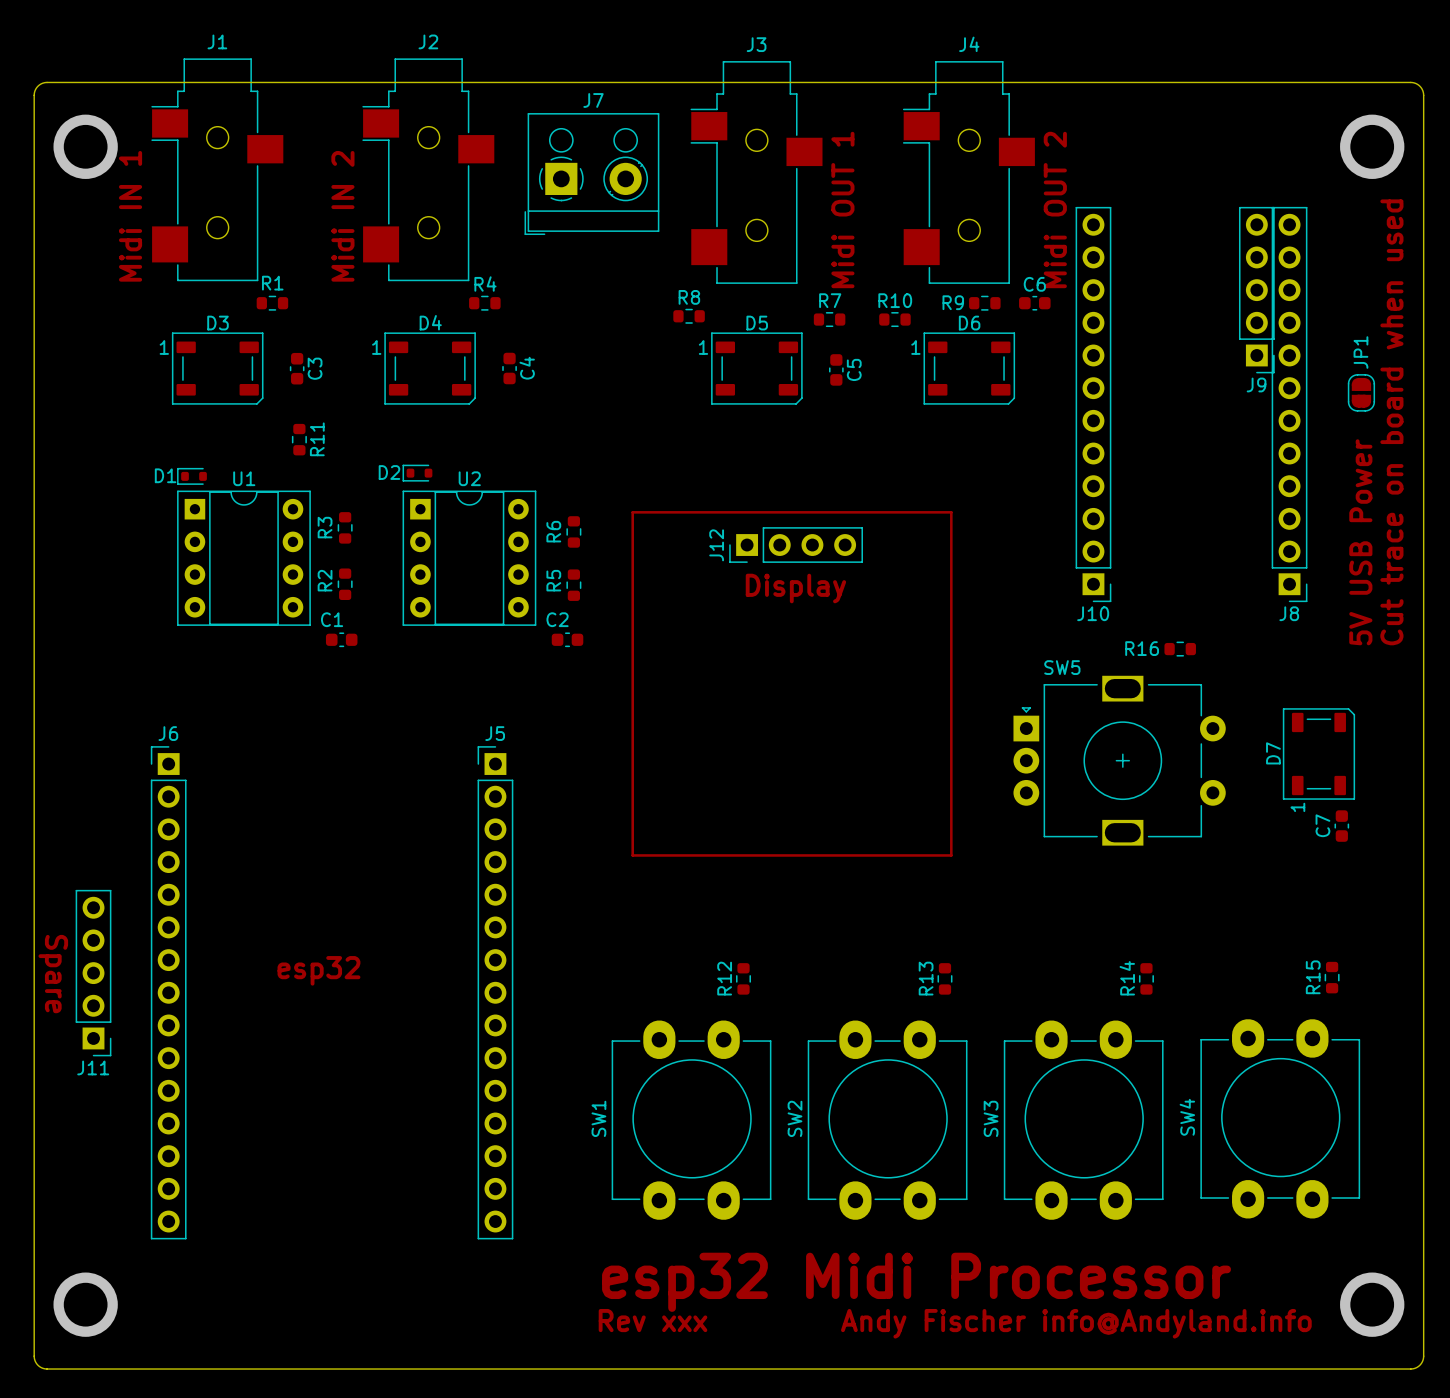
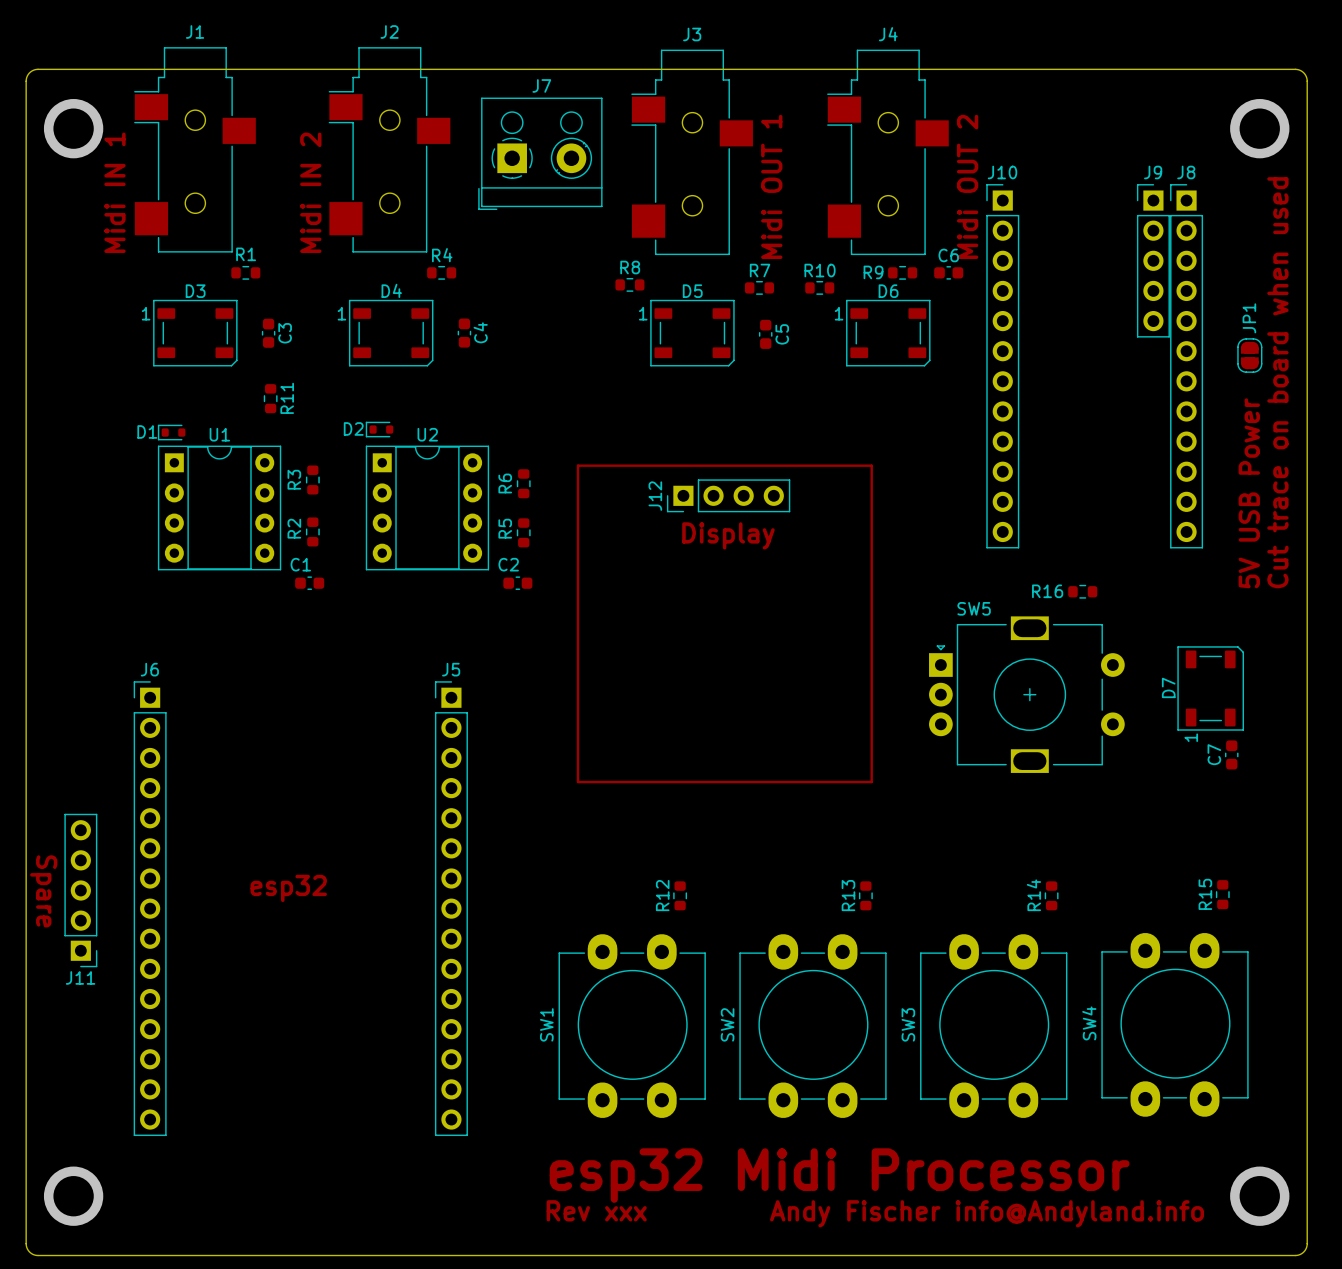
J9 rotation: 0° (1256, 290) -> 180° (1153, 260)
J10 rotation: 0° (1093, 404) -> 180° (1002, 366)
J8 rotation: 0° (1289, 404) -> 180° (1186, 366)

